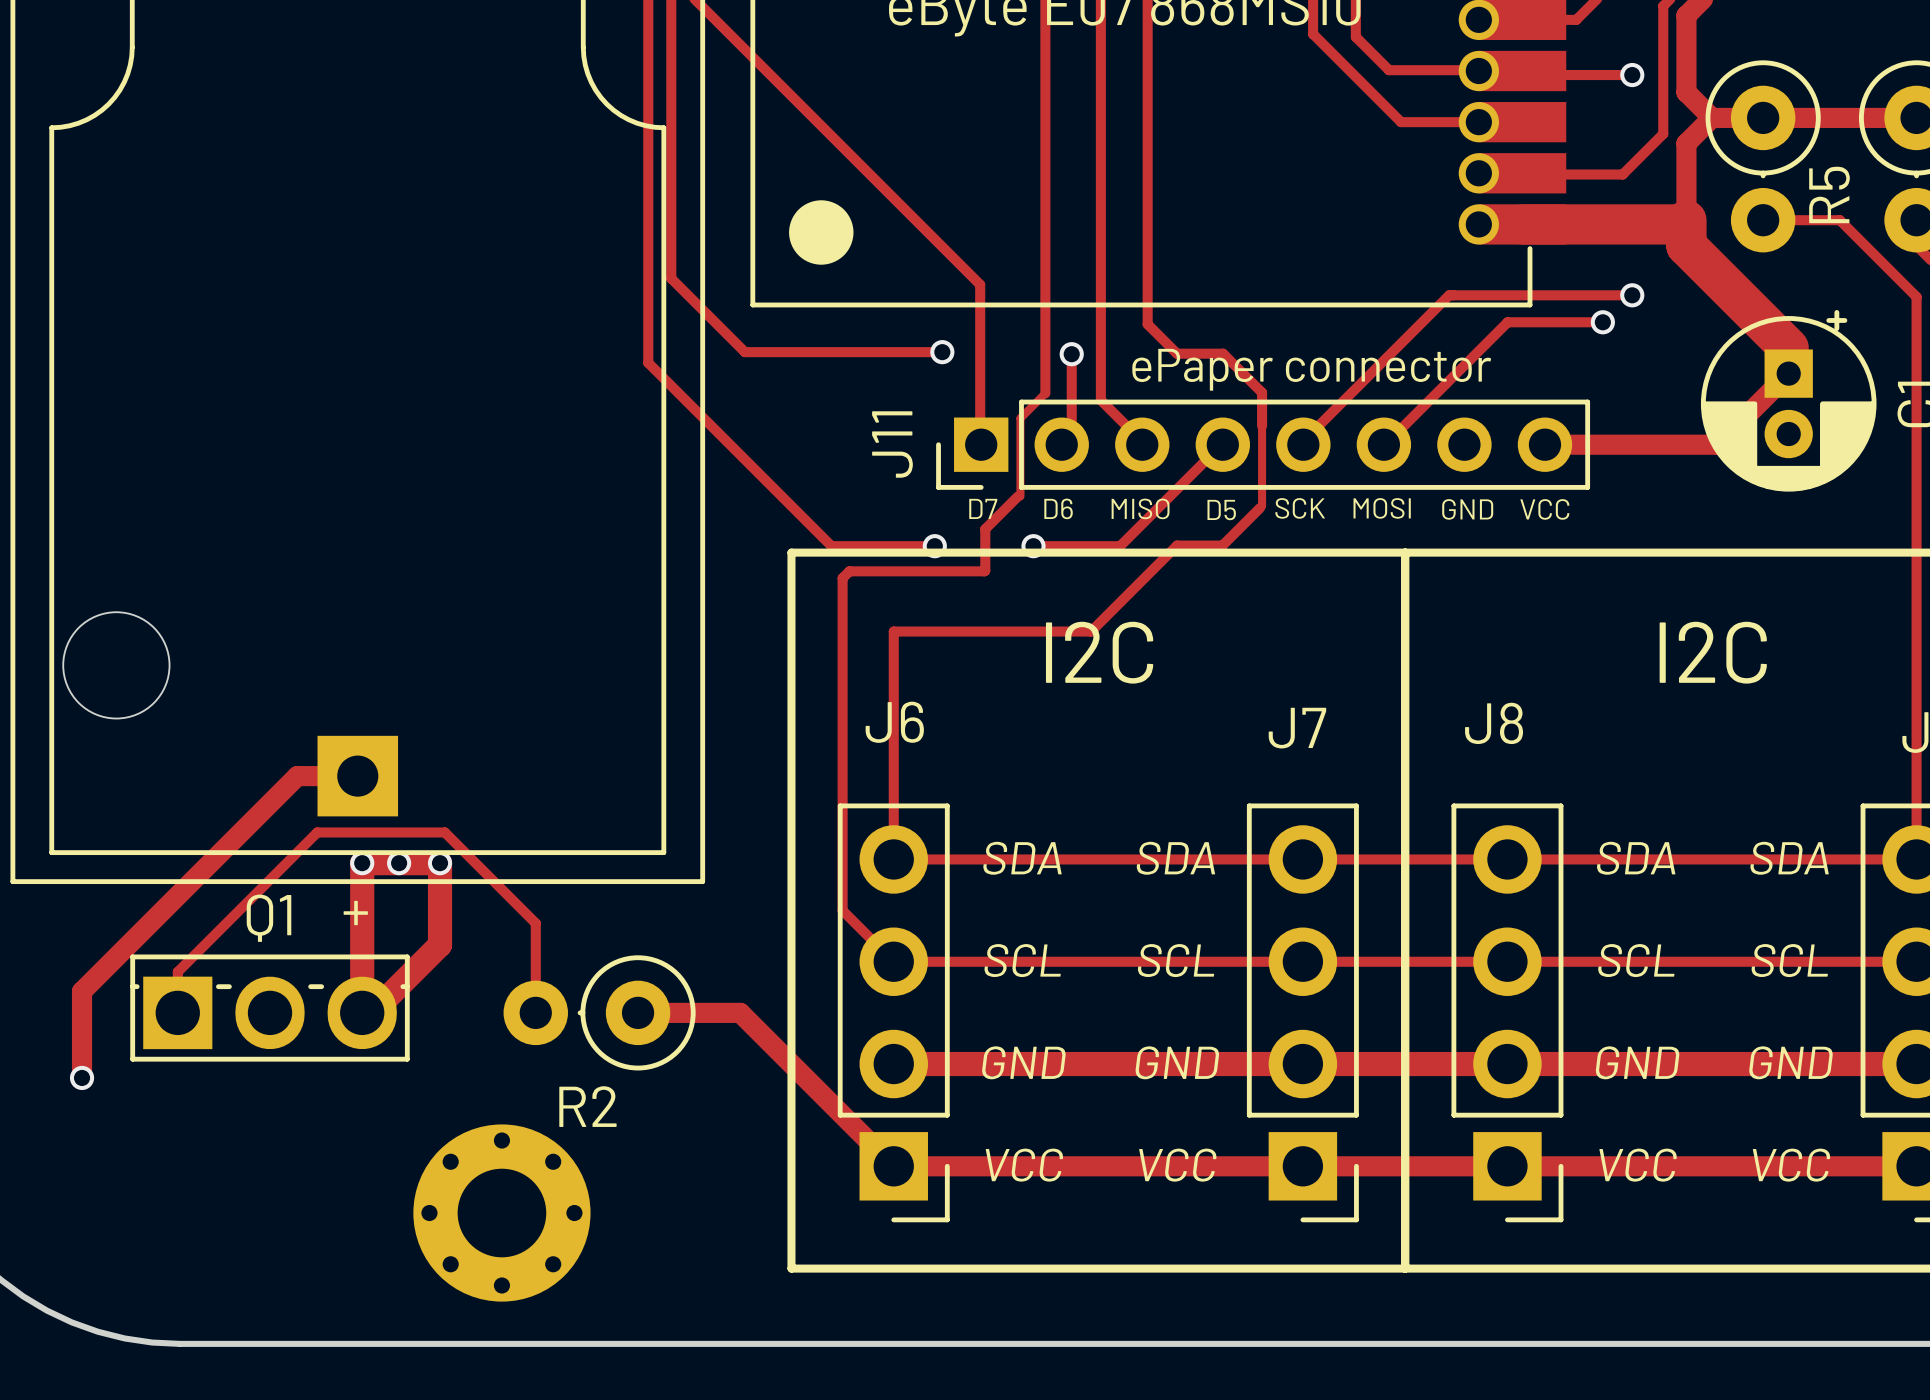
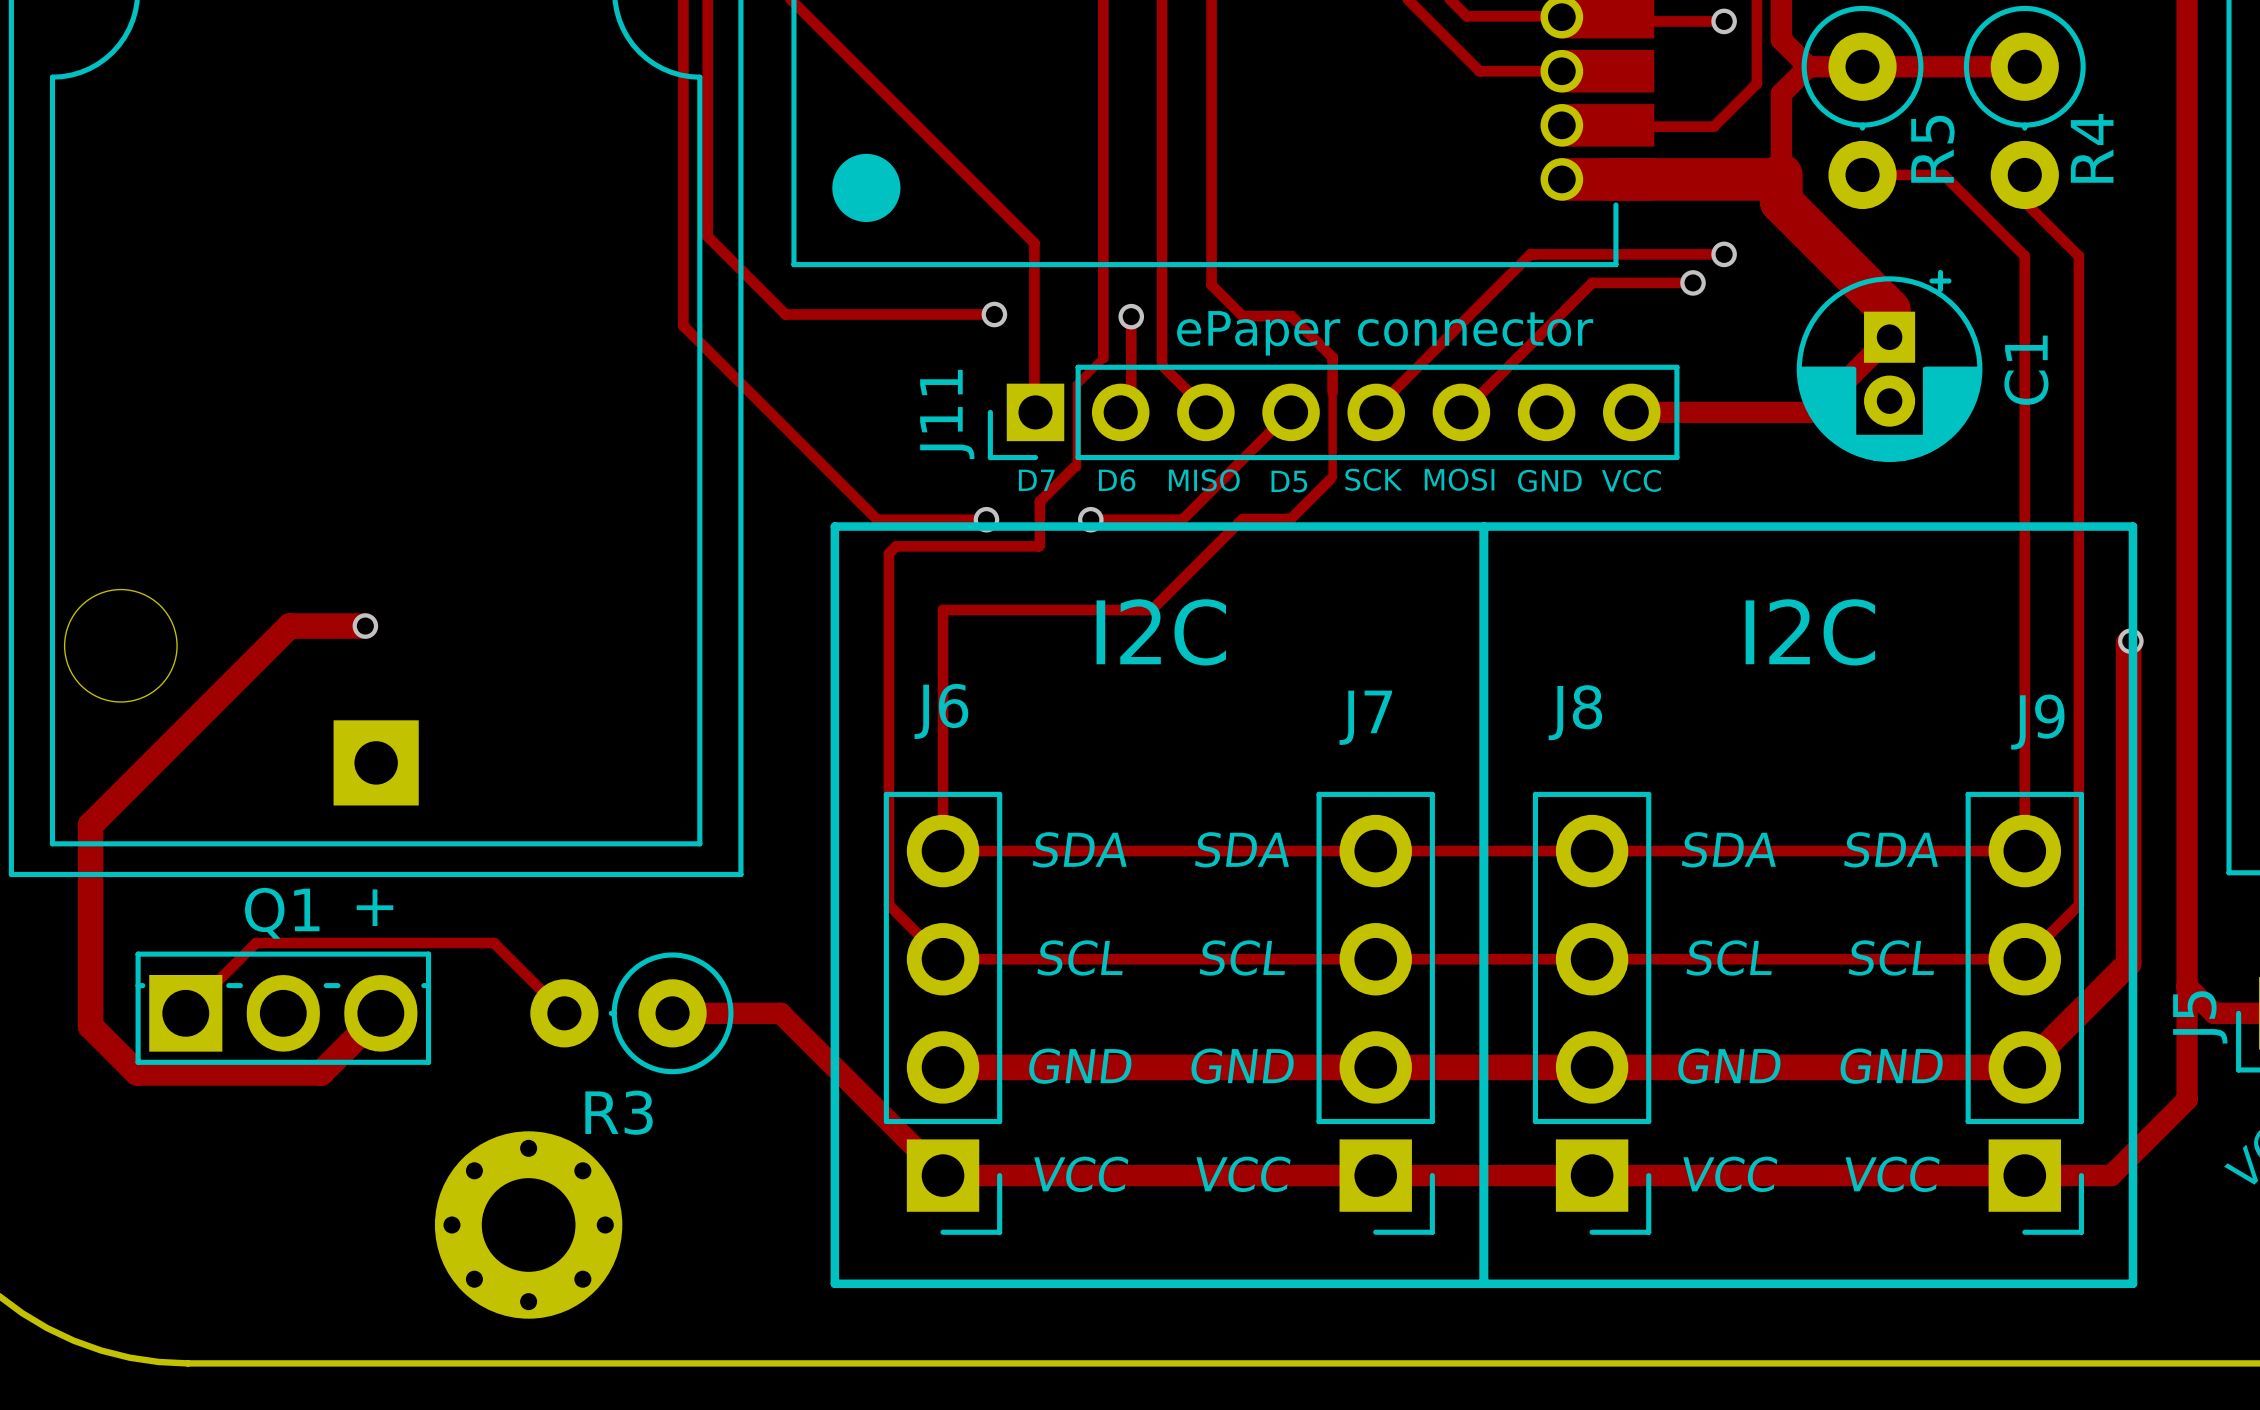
via: none -> (365, 626)
track: (357, 776) (297, 776) (82, 991) (82, 1077) -> none
via: (362, 863) -> none
via: (399, 863) -> none
via: (440, 863) -> none
track: (177, 1012) (177, 971) (317, 832) (444, 832) (535, 923) (535, 1012) -> (185, 1013) (256, 943) (494, 943) (564, 1013)
track: (362, 1012) (362, 863) (440, 863) (440, 944) (372, 1012) -> (380, 1013) (321, 1072) (137, 1072) (90, 1026) (90, 825) (289, 626) (365, 626)
via: (82, 1077) -> none
R2 name: R2 (587, 1106) -> R3 (619, 1112)

